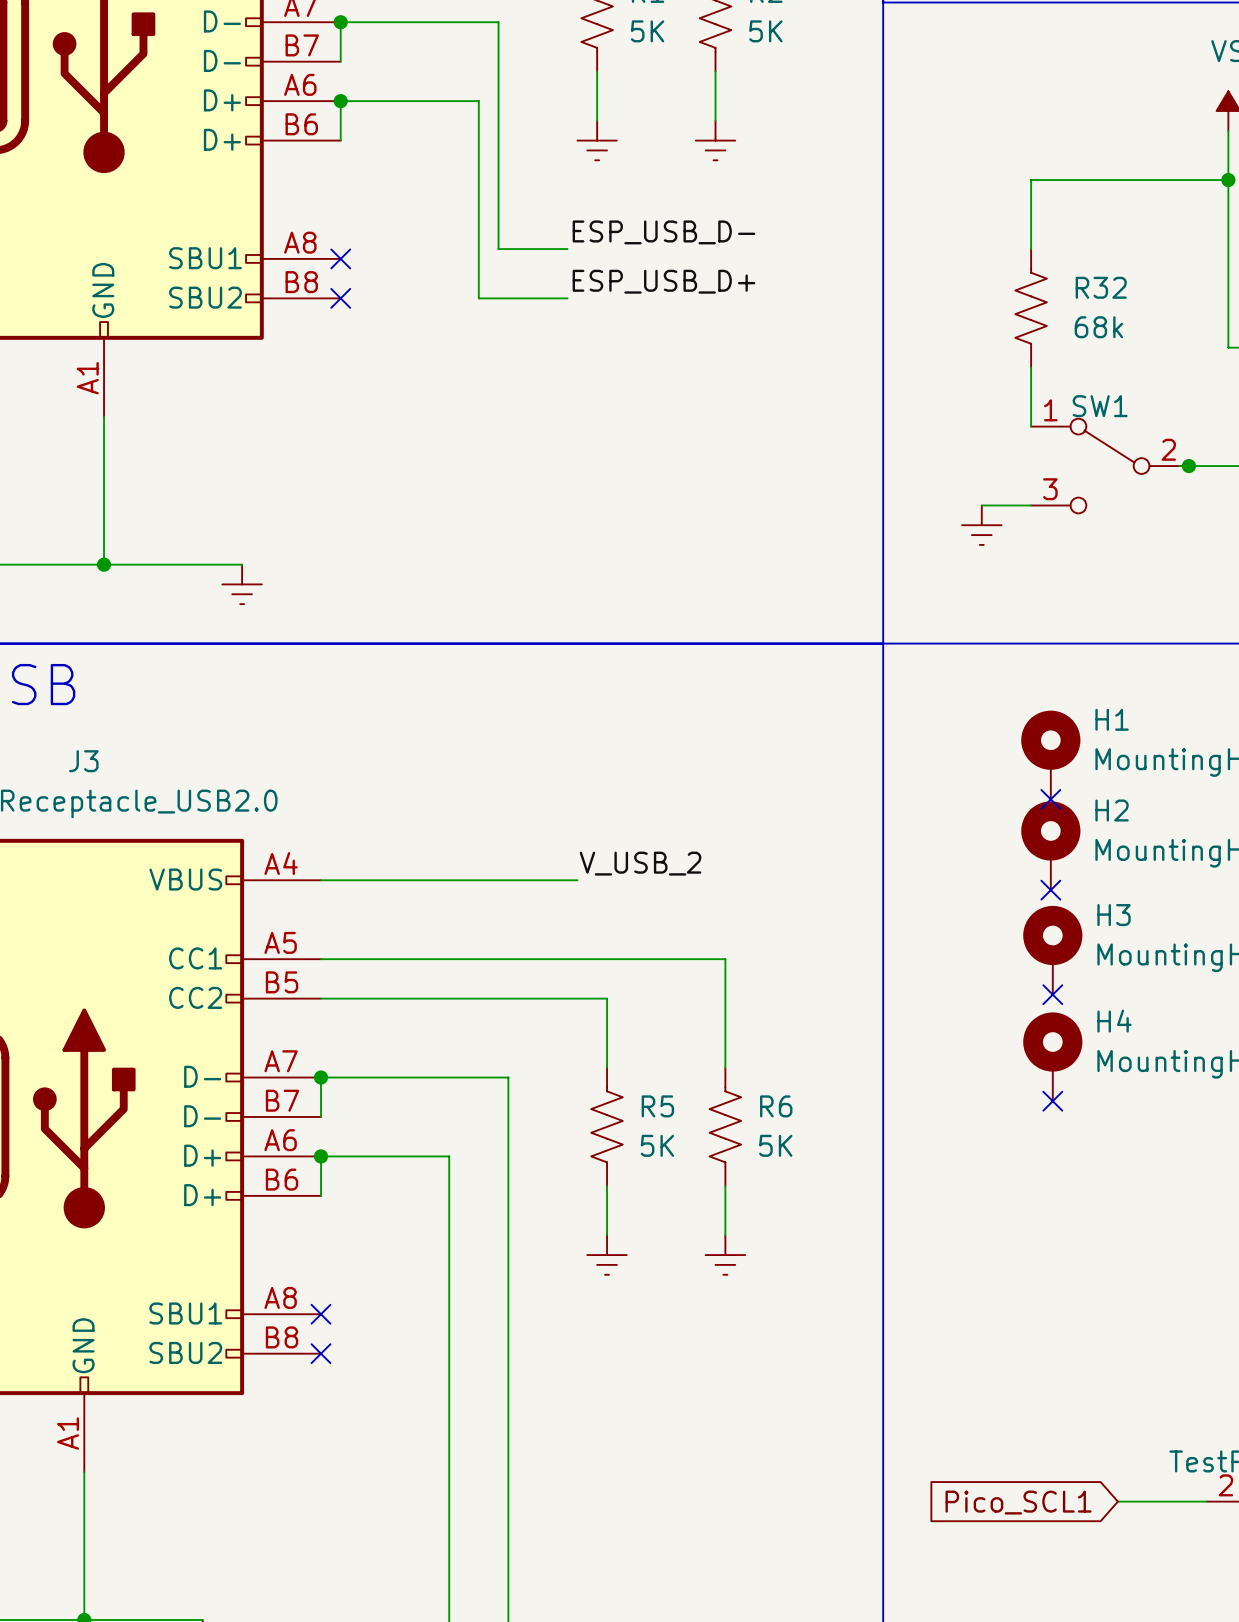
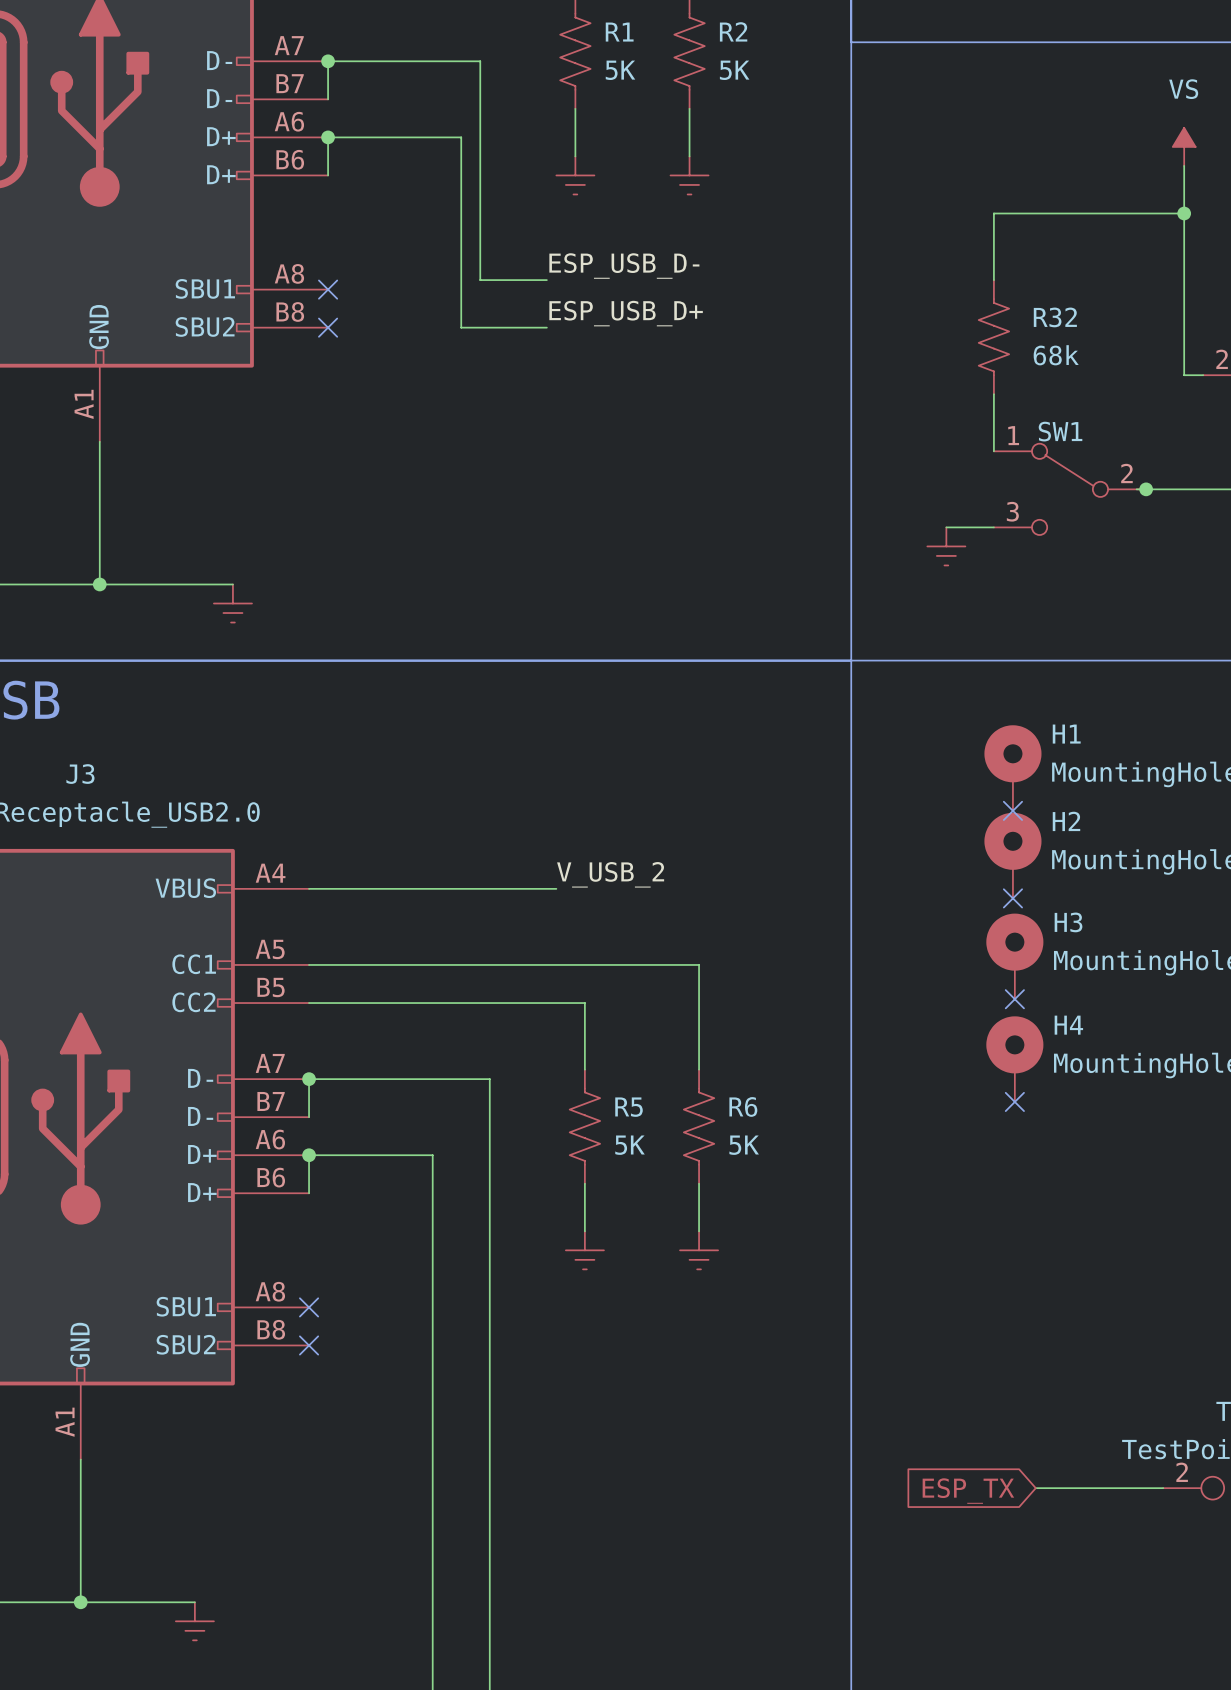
wire: none -> (1035, 1488) (1077, 1488)
global label: none -> ESP_TX (968, 1491)
global label: Pico_SCL1 (1018, 1502) -> none

